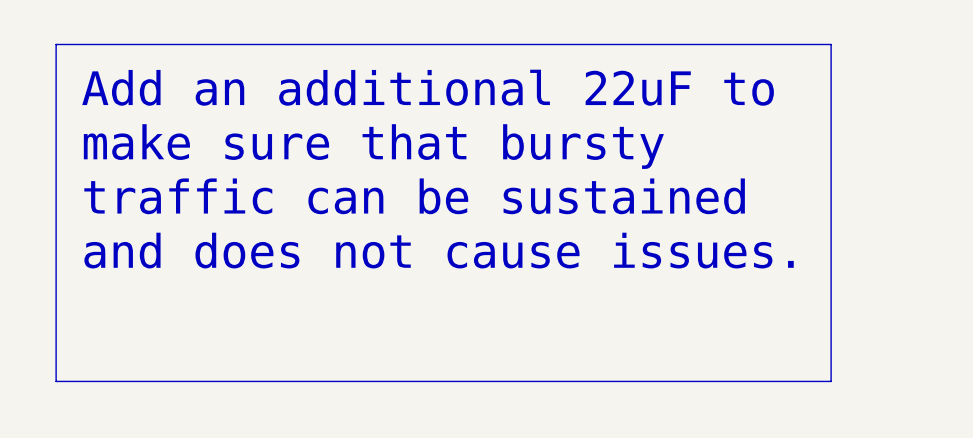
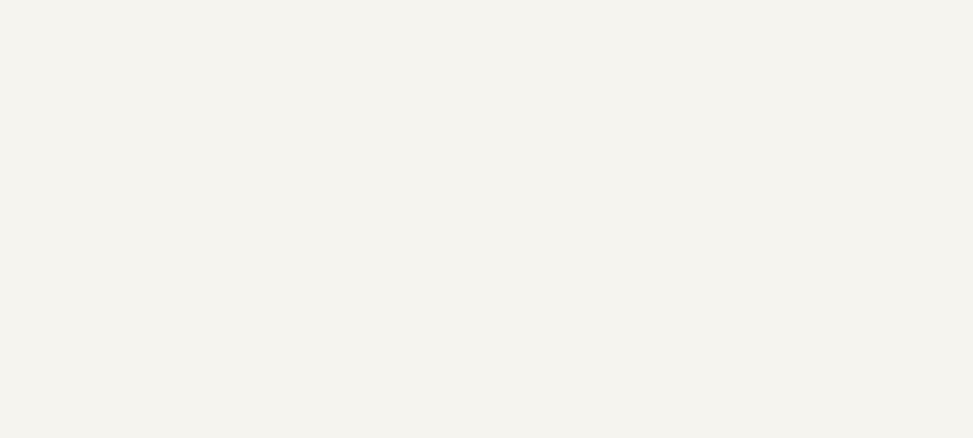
line: (56, 44) (831, 44) (831, 381) (56, 381) (56, 44) -> none
text: Add an additional 22uF to (428, 87) -> none
text: make sure that bursty (373, 146) -> none
text: traffic can be sustained (414, 196) -> none
text: and does not cause issues. (439, 250) -> none

